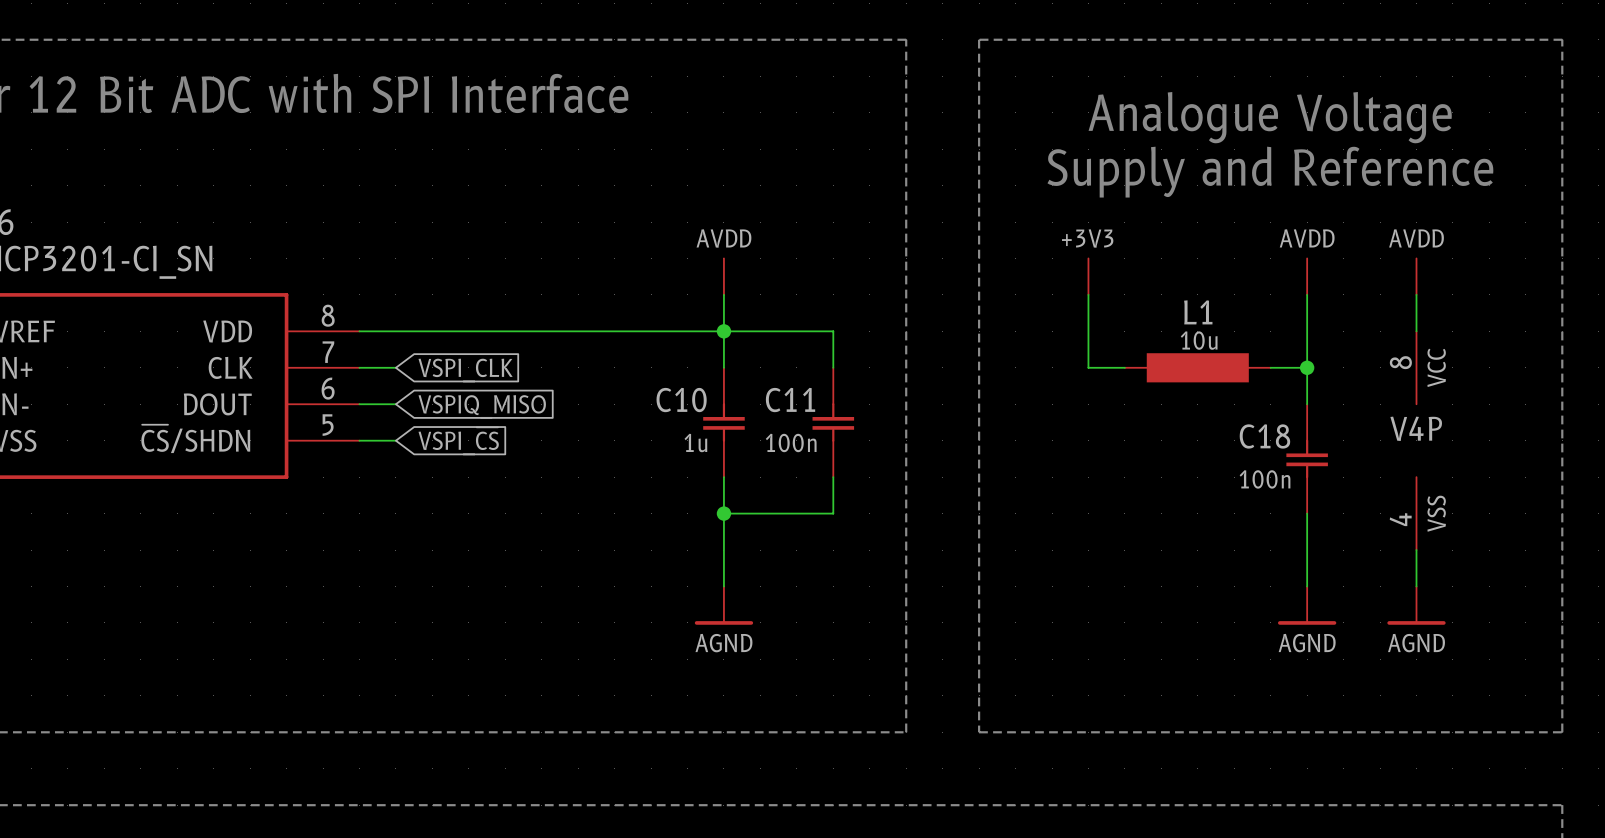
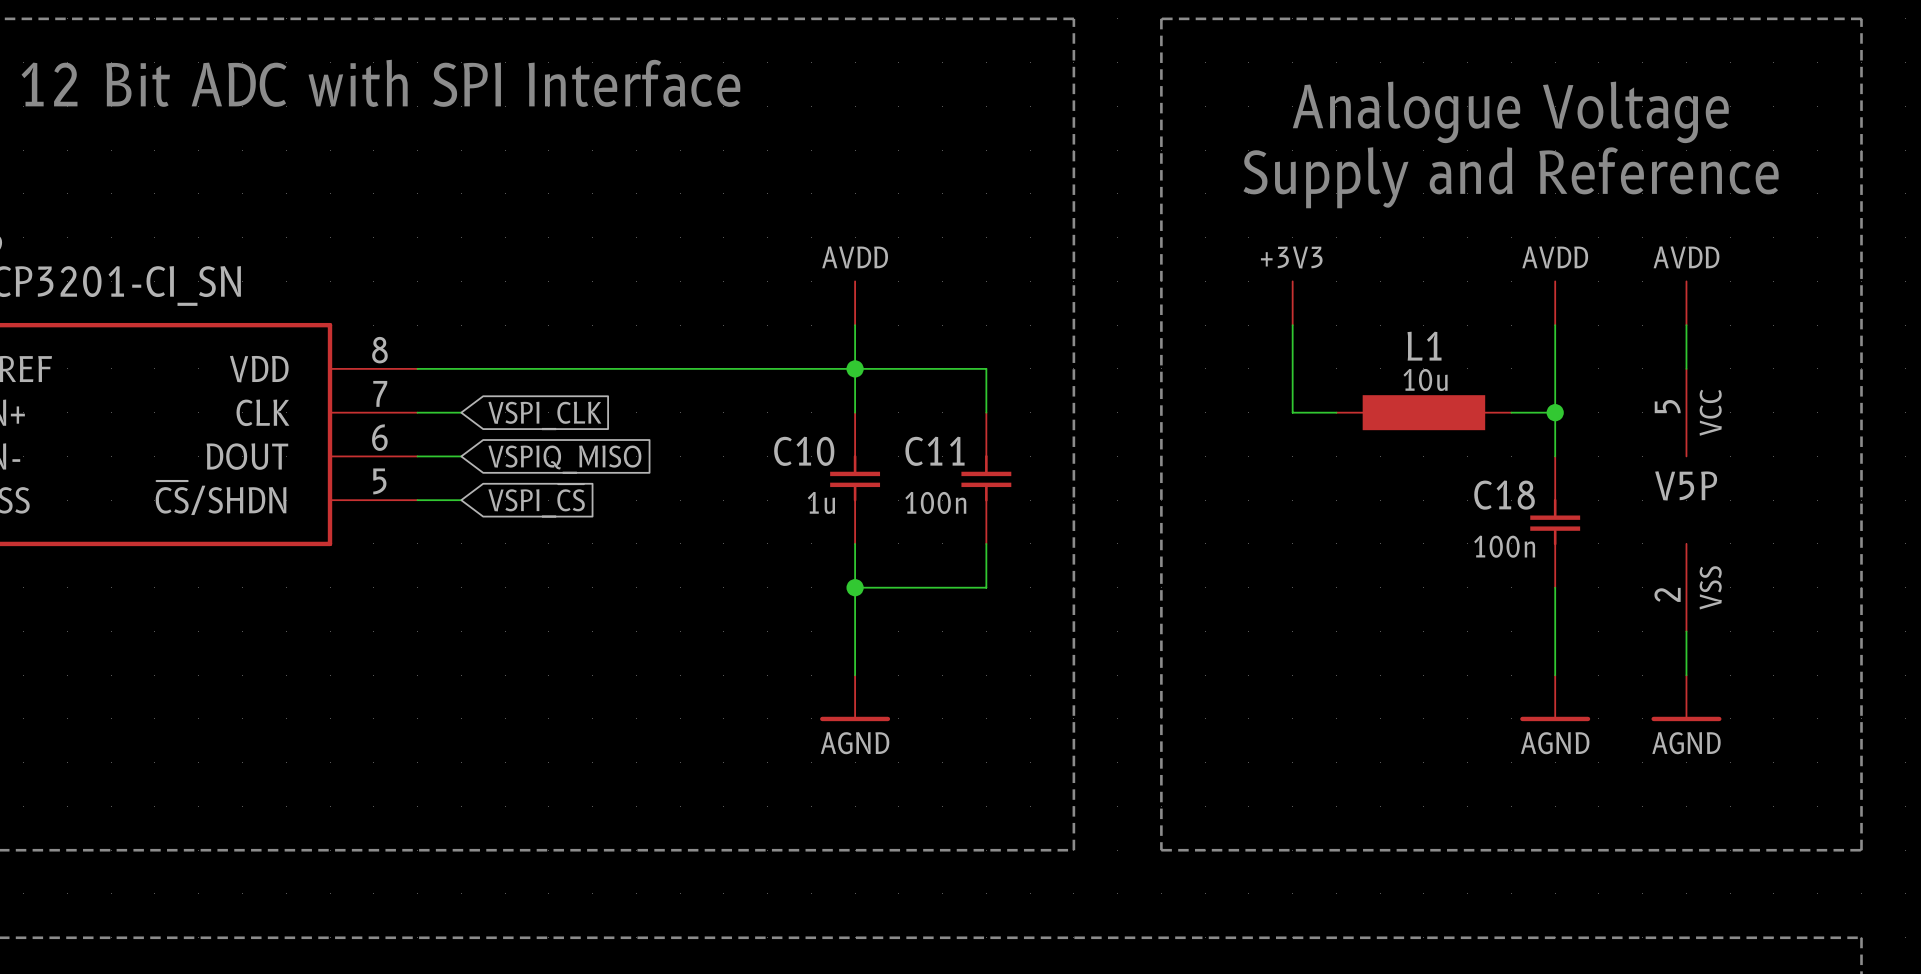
V4P pin number: 8 (1400, 362) -> 5 (1667, 406)
V4P name: V4P (1416, 428) -> V5P (1686, 485)
V4P pin number: 4 (1400, 519) -> 2 (1667, 594)

